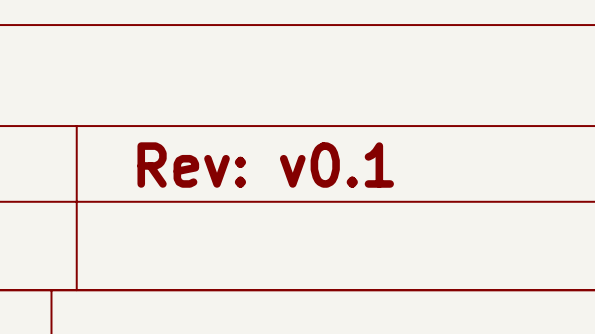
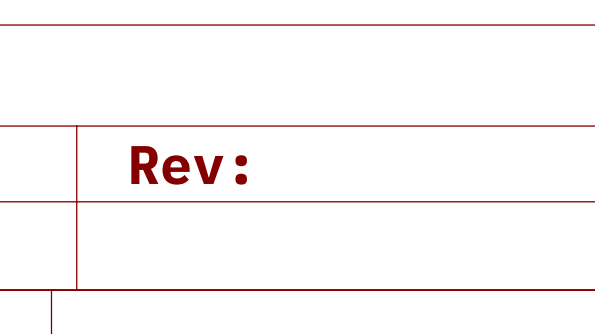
title block: Rev: v0.1 (265, 165) -> Rev: (189, 165)

